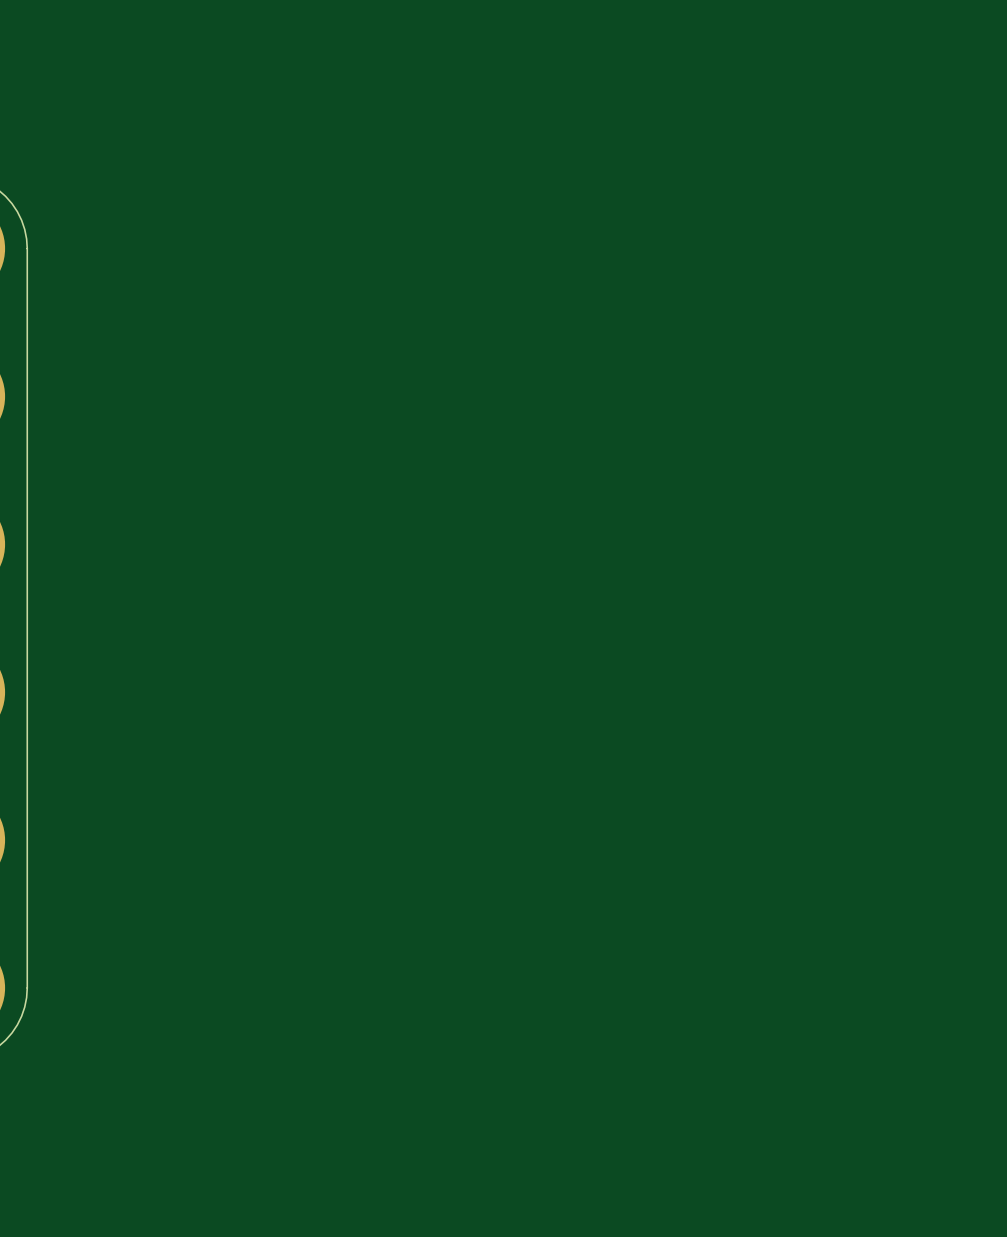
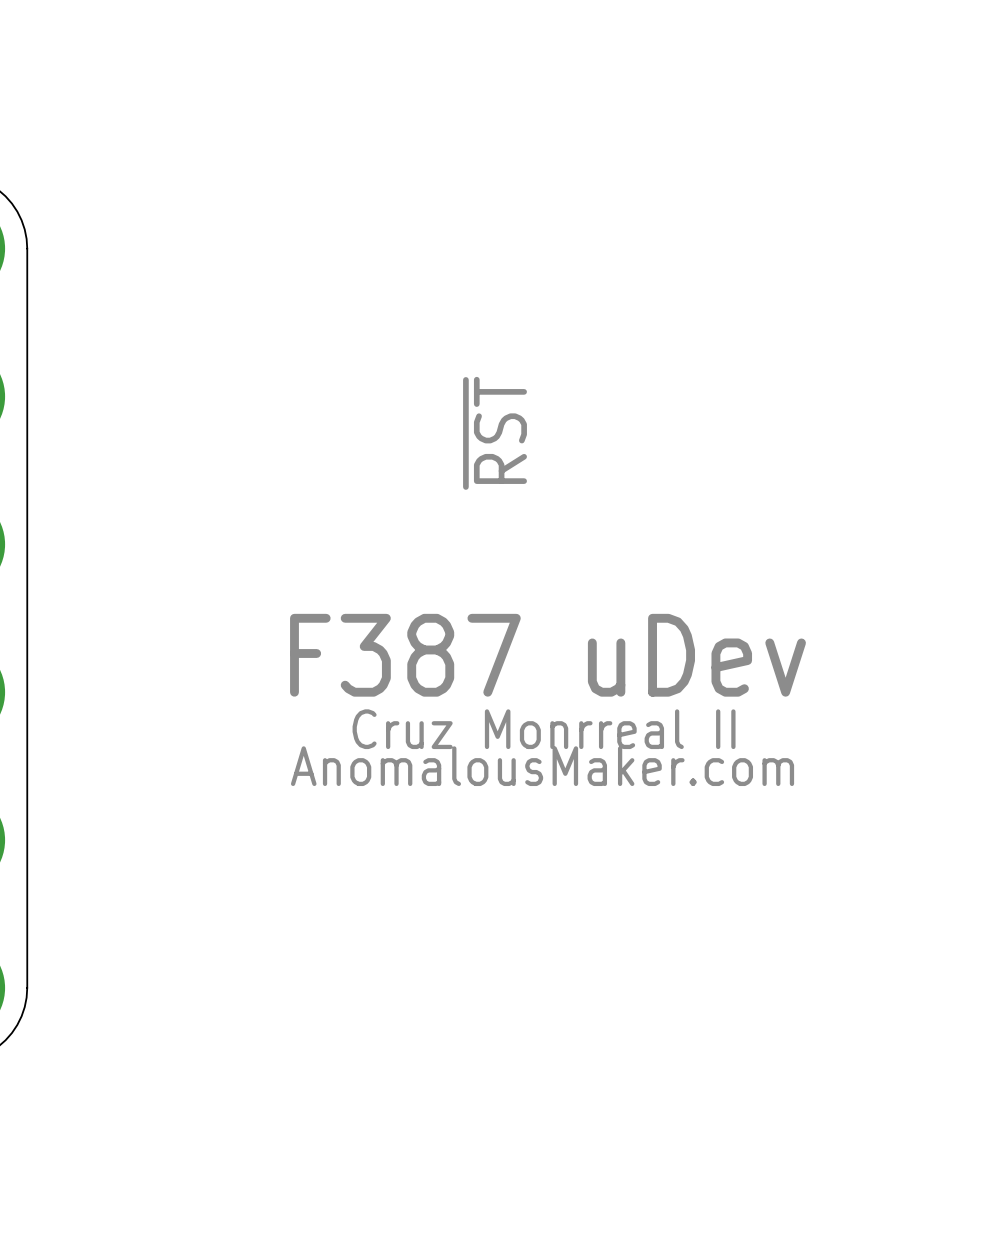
text: none -> ~{RST} (495, 433)
text: none -> F387 uDev (547, 655)
text: none -> Cruz Monrreal II (544, 729)
text: none -> AnomalousMaker.com (542, 766)

